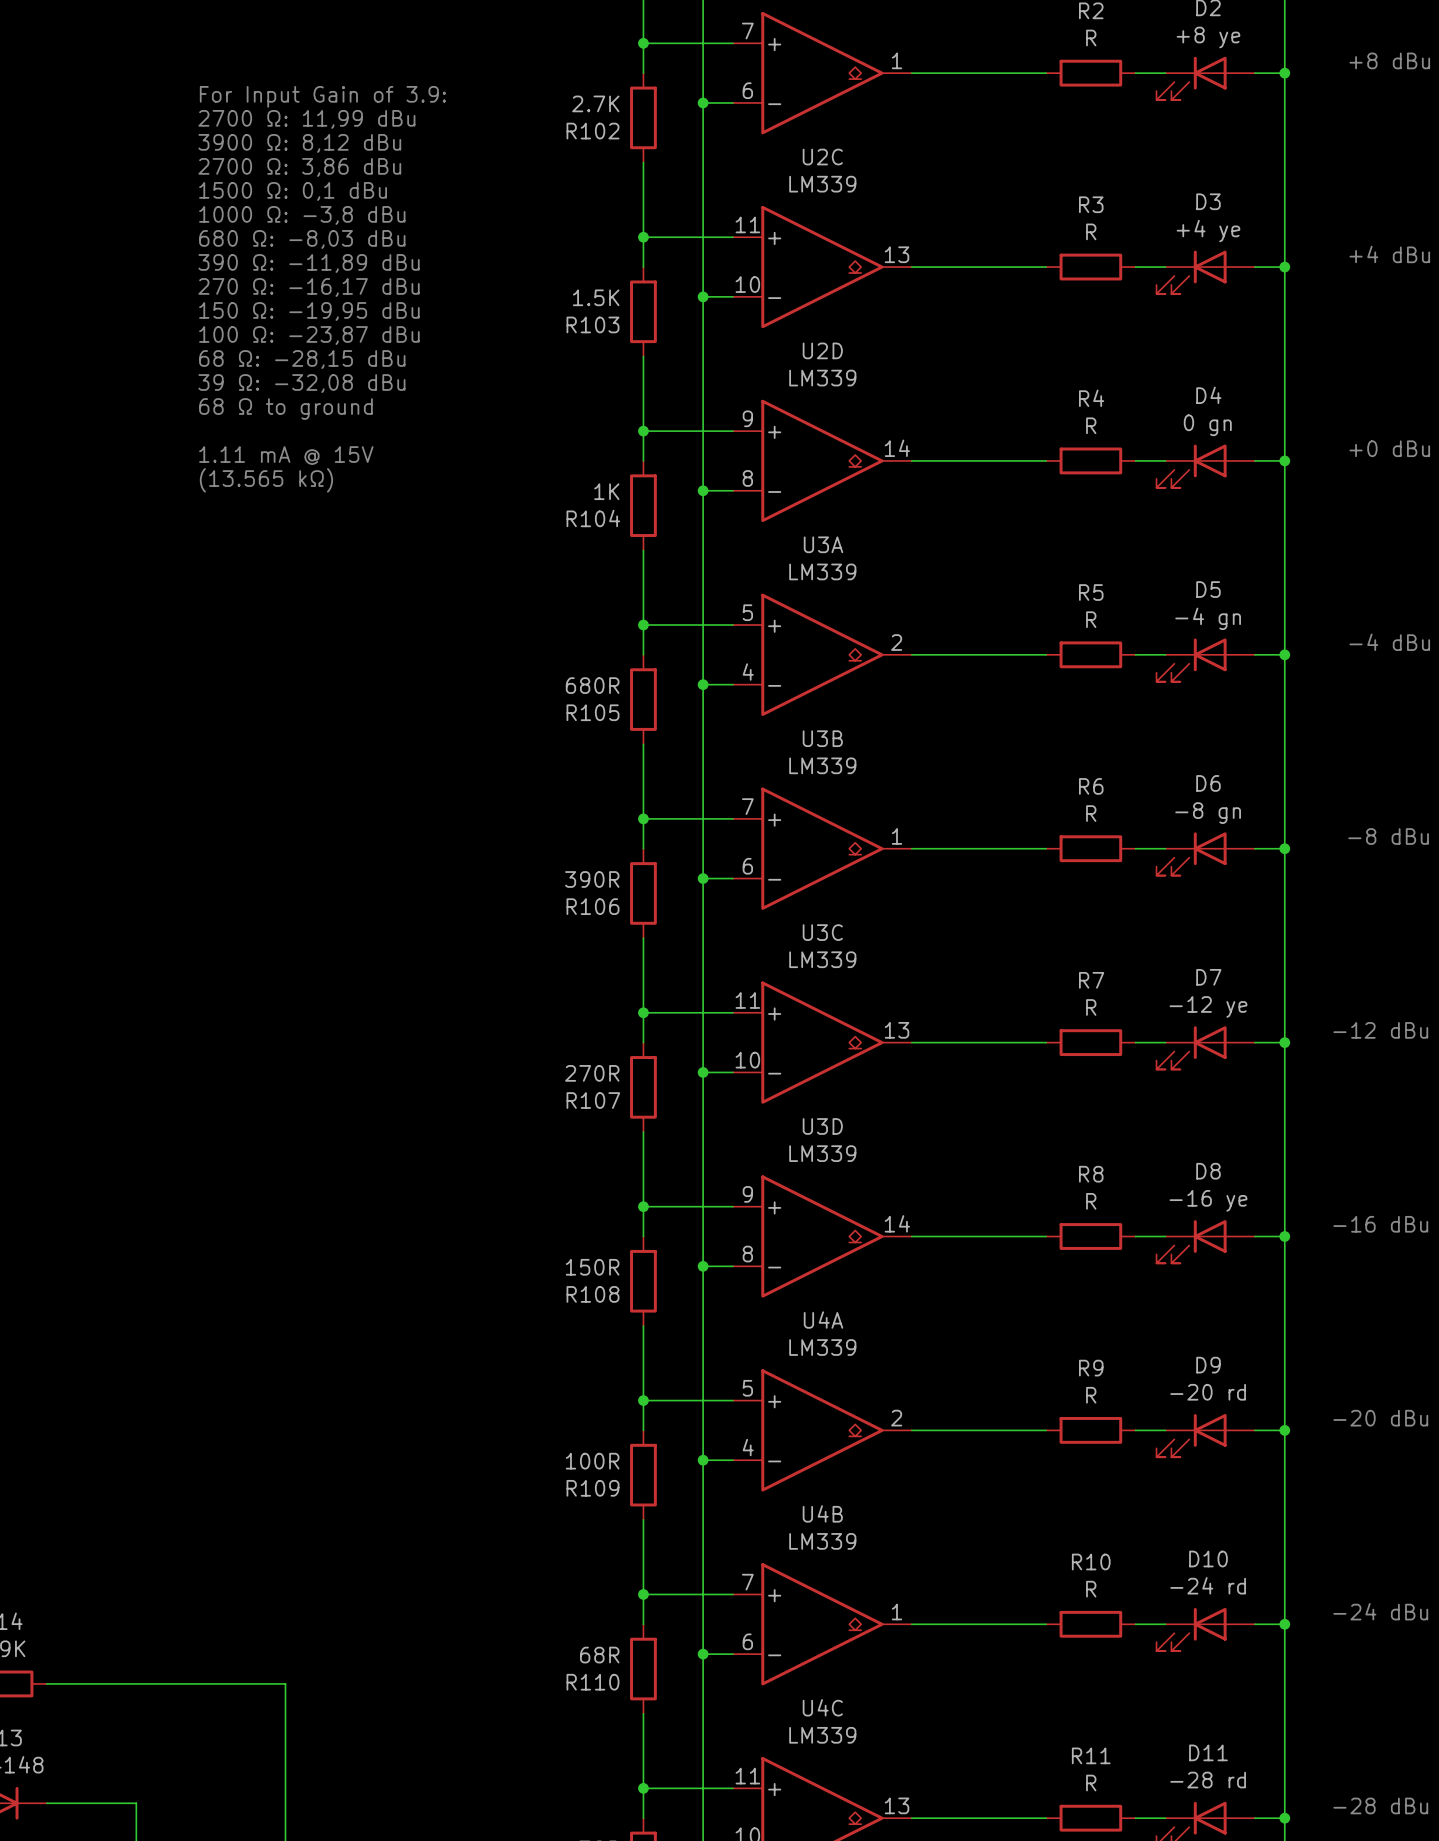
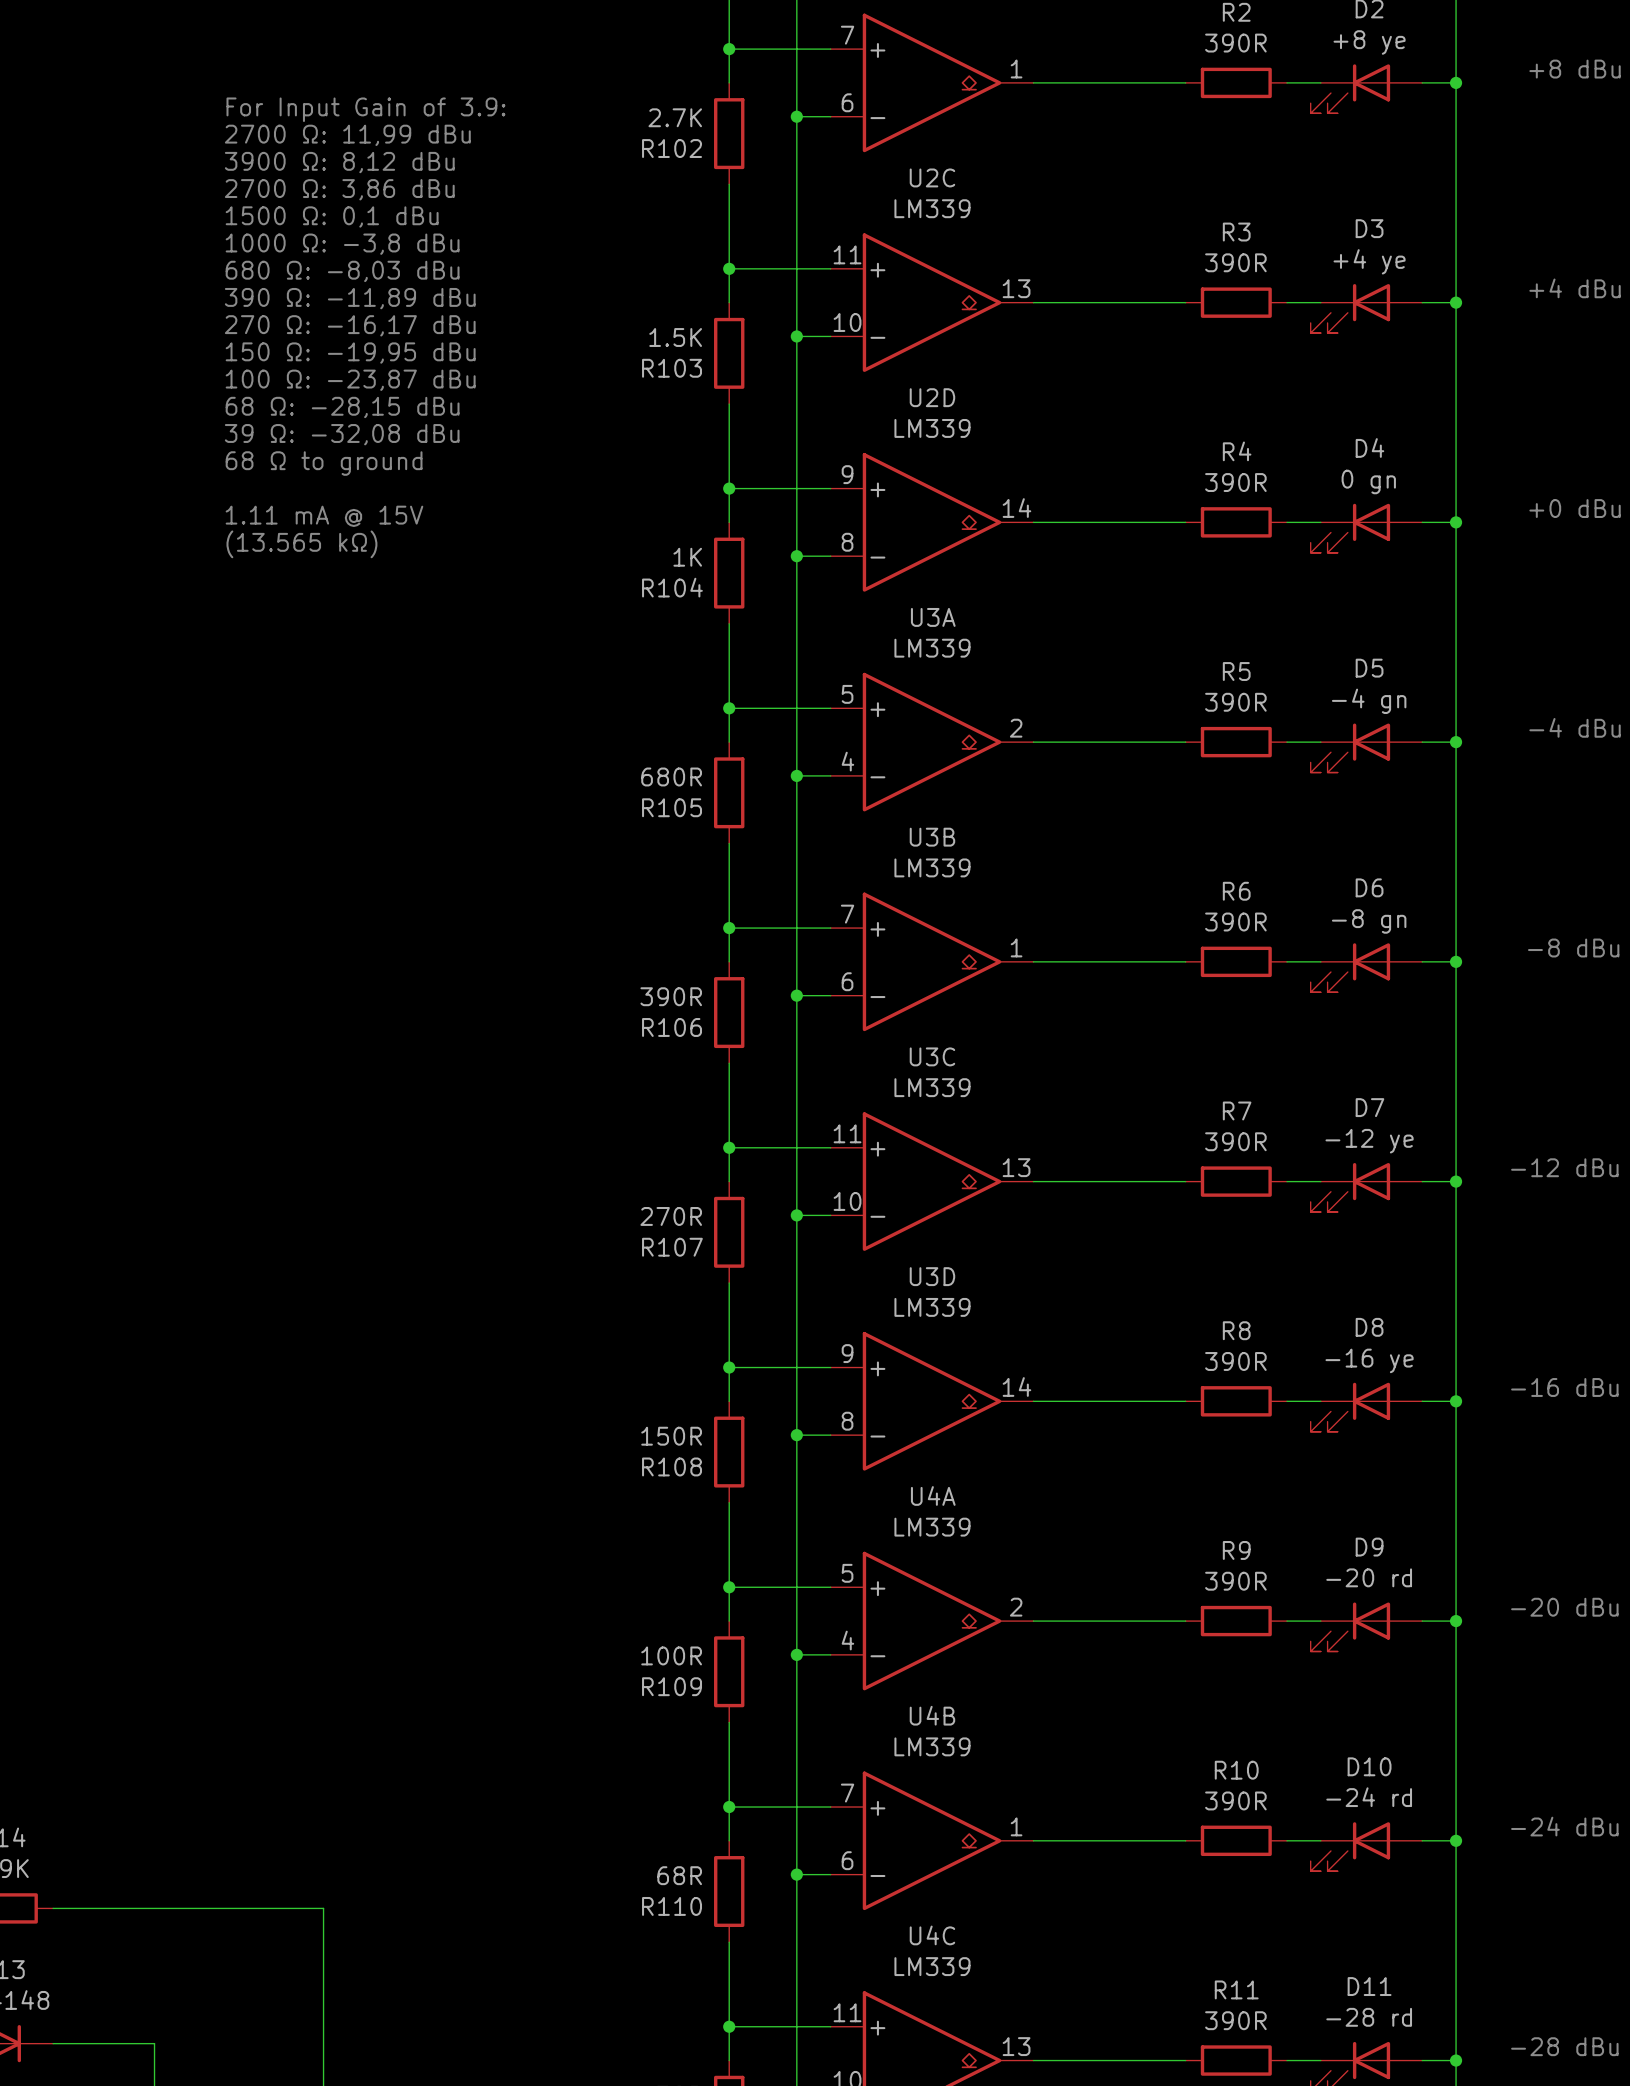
R2 value: R (1091, 37) -> 390R (1235, 43)
R3 value: R (1091, 231) -> 390R (1235, 262)
R4 value: R (1091, 425) -> 390R (1235, 482)
R5 value: R (1091, 619) -> 390R (1235, 702)
R6 value: R (1091, 813) -> 390R (1235, 922)
R7 value: R (1091, 1007) -> 390R (1235, 1141)
R8 value: R (1091, 1201) -> 390R (1235, 1361)
R9 value: R (1091, 1395) -> 390R (1235, 1581)
R10 value: R (1091, 1589) -> 390R (1235, 1800)
R11 value: R (1091, 1783) -> 390R (1235, 2020)

